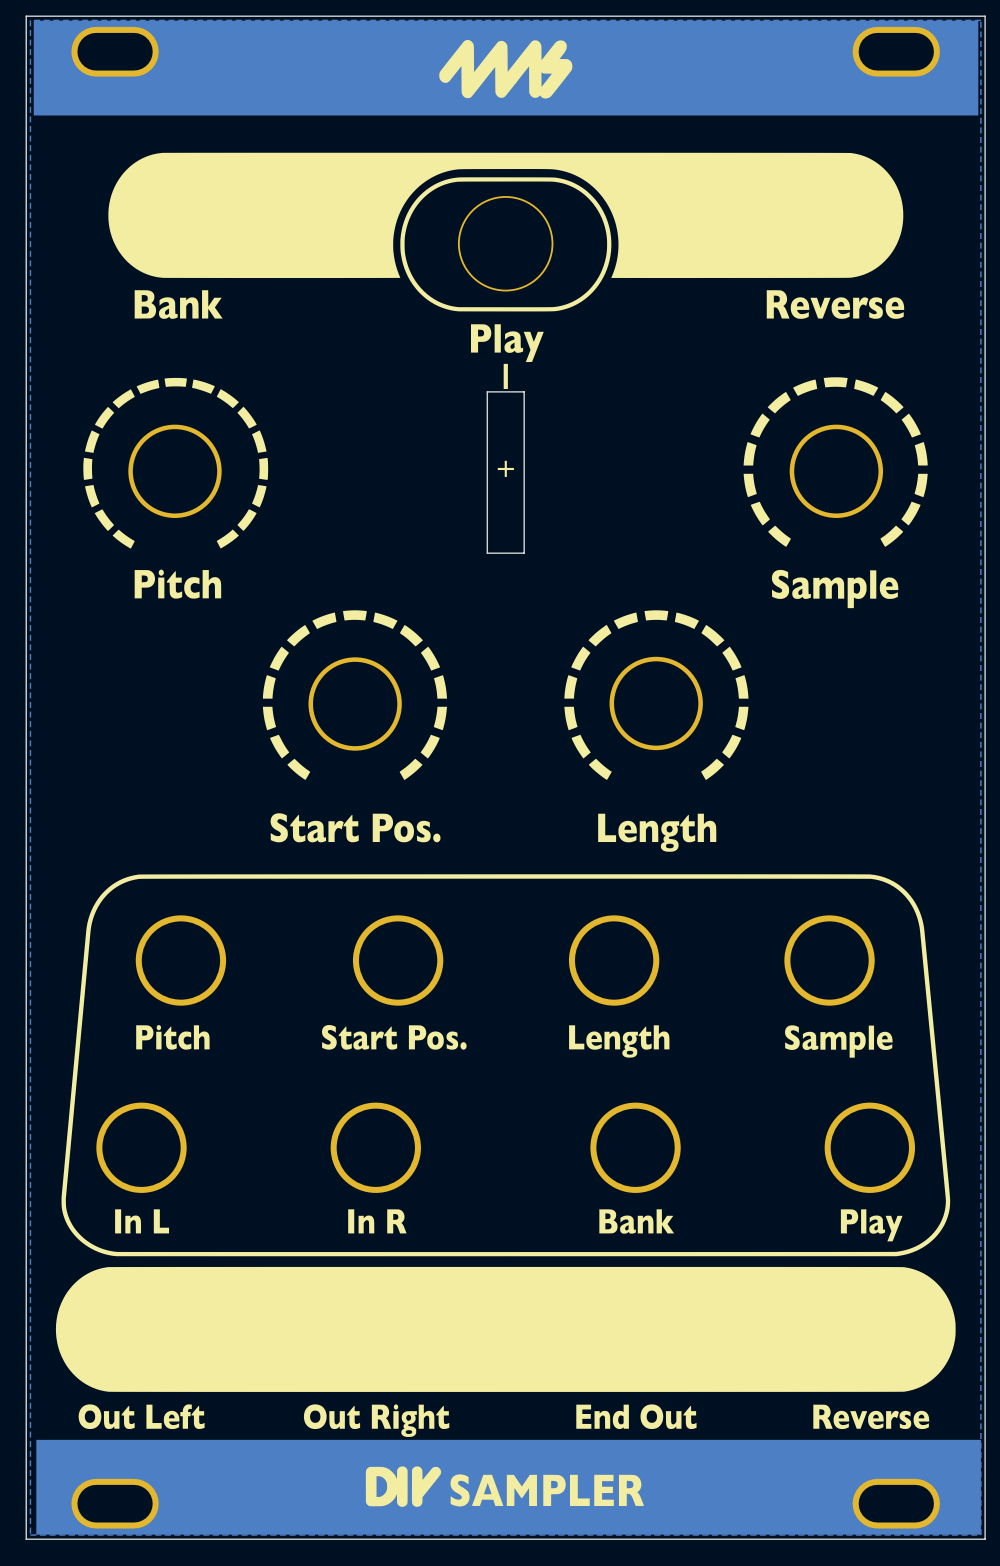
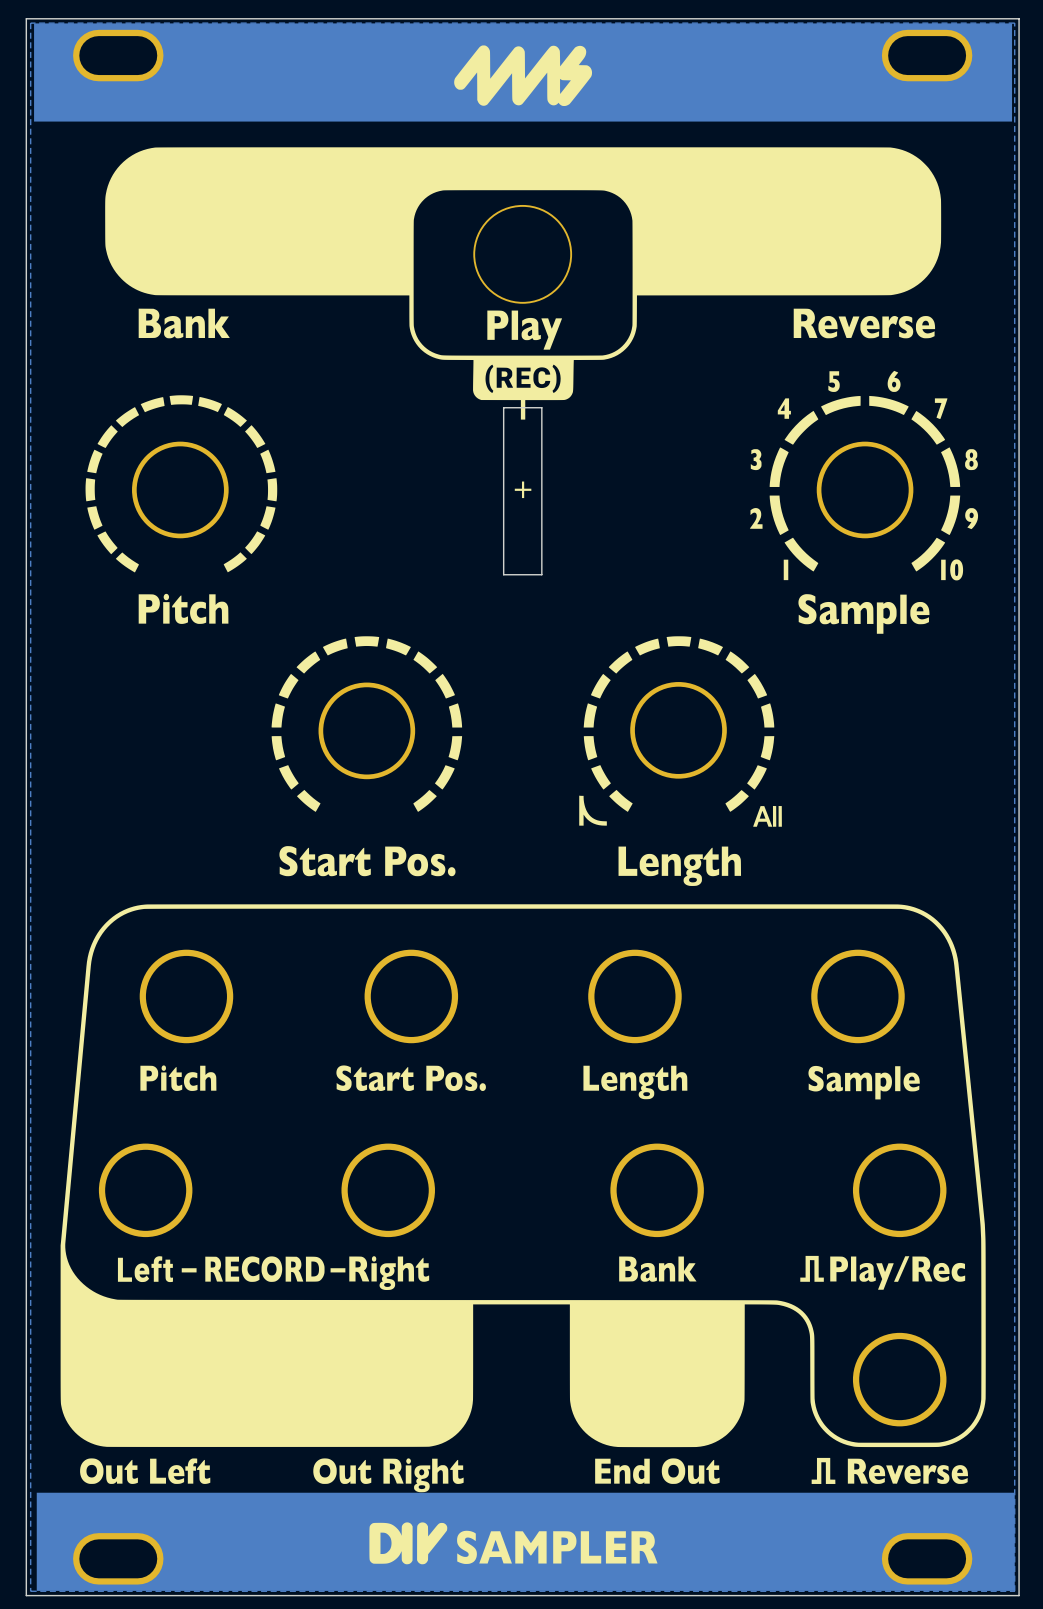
drawing shape: [55, 40, 956, 1507] -> [60, 45, 986, 1565]

